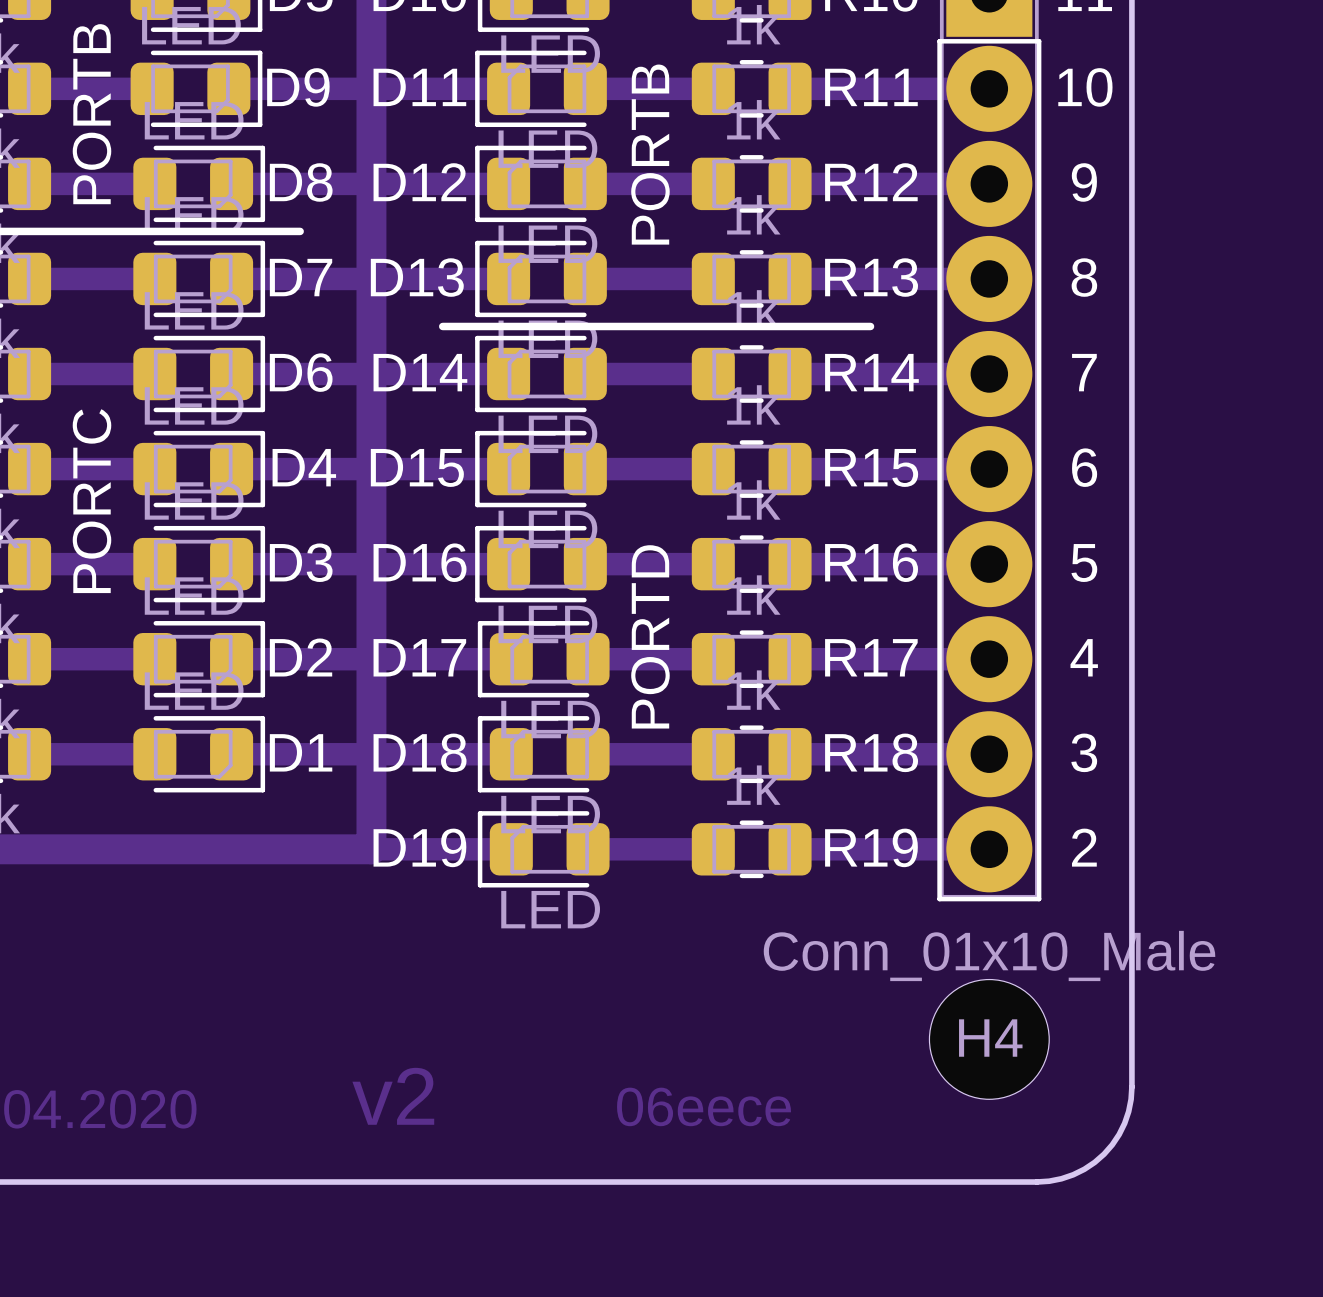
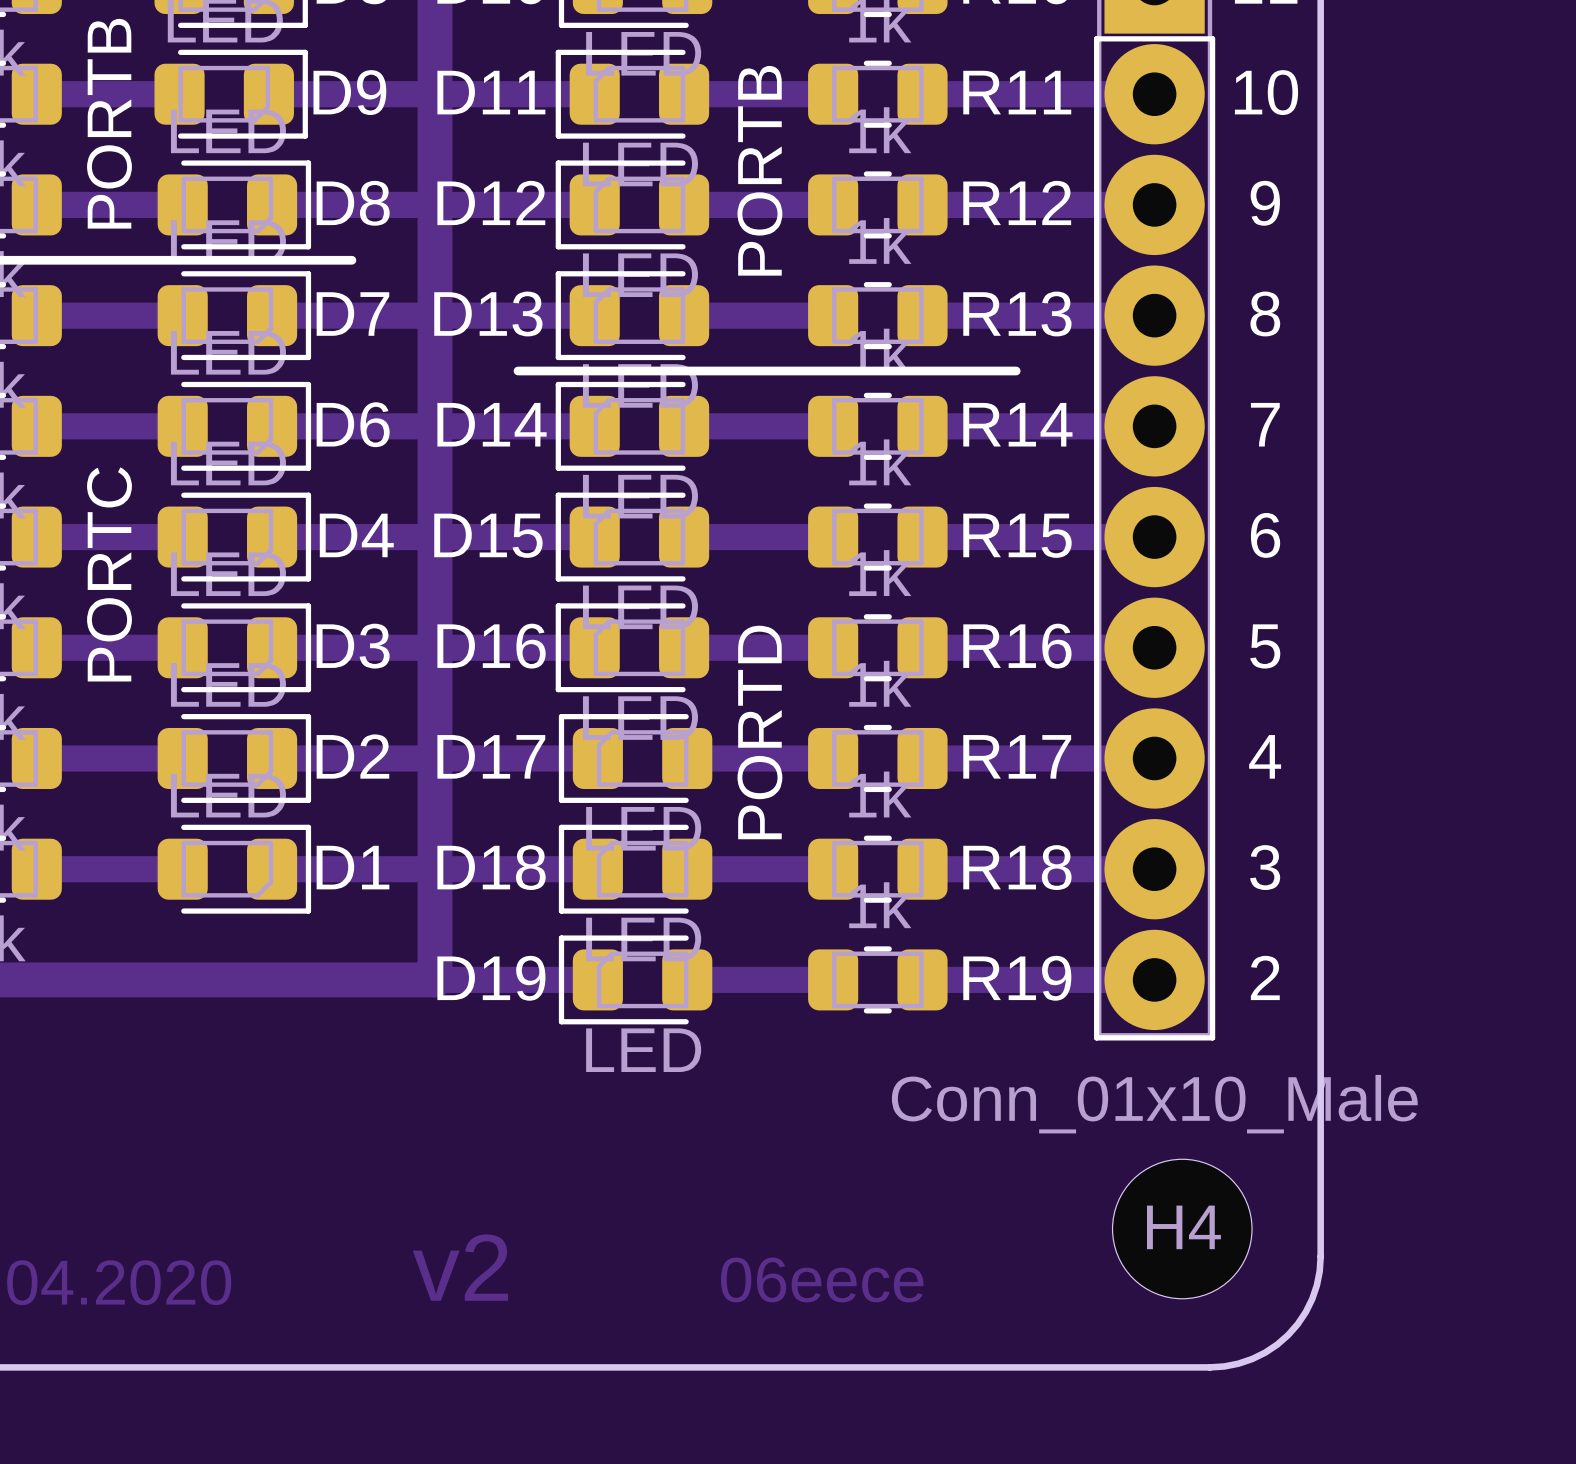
H4 position: (989, 1039) -> (1182, 1229)

